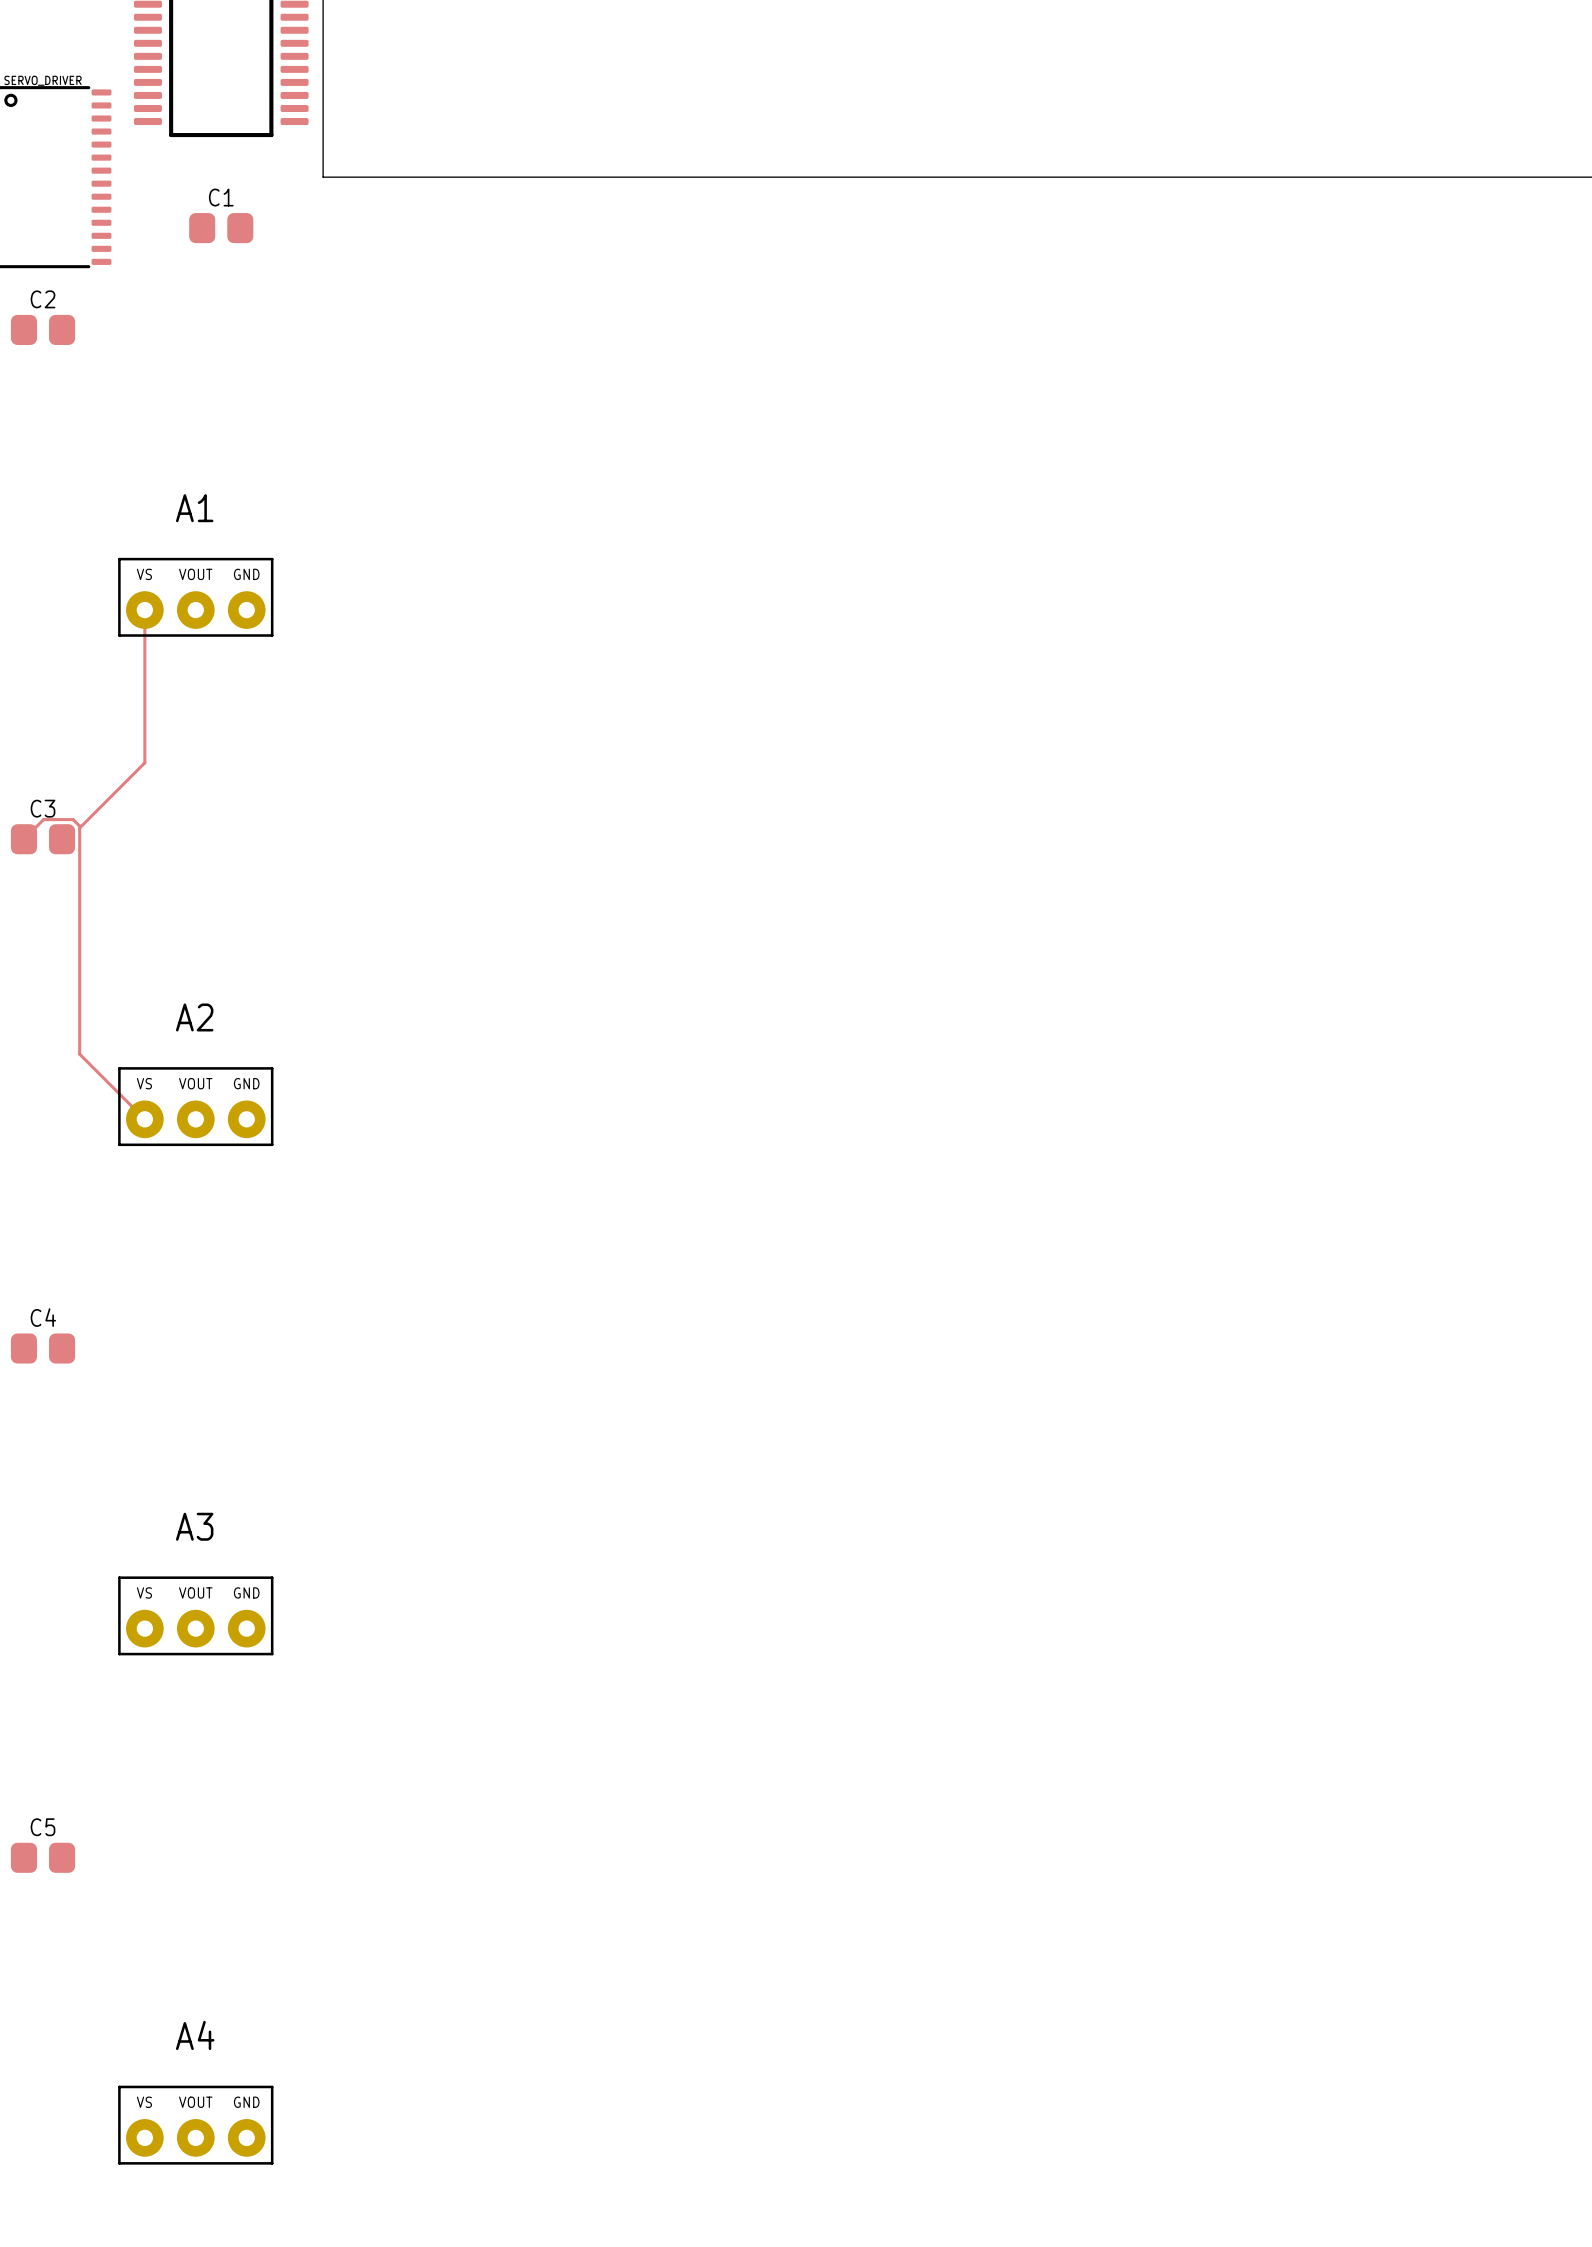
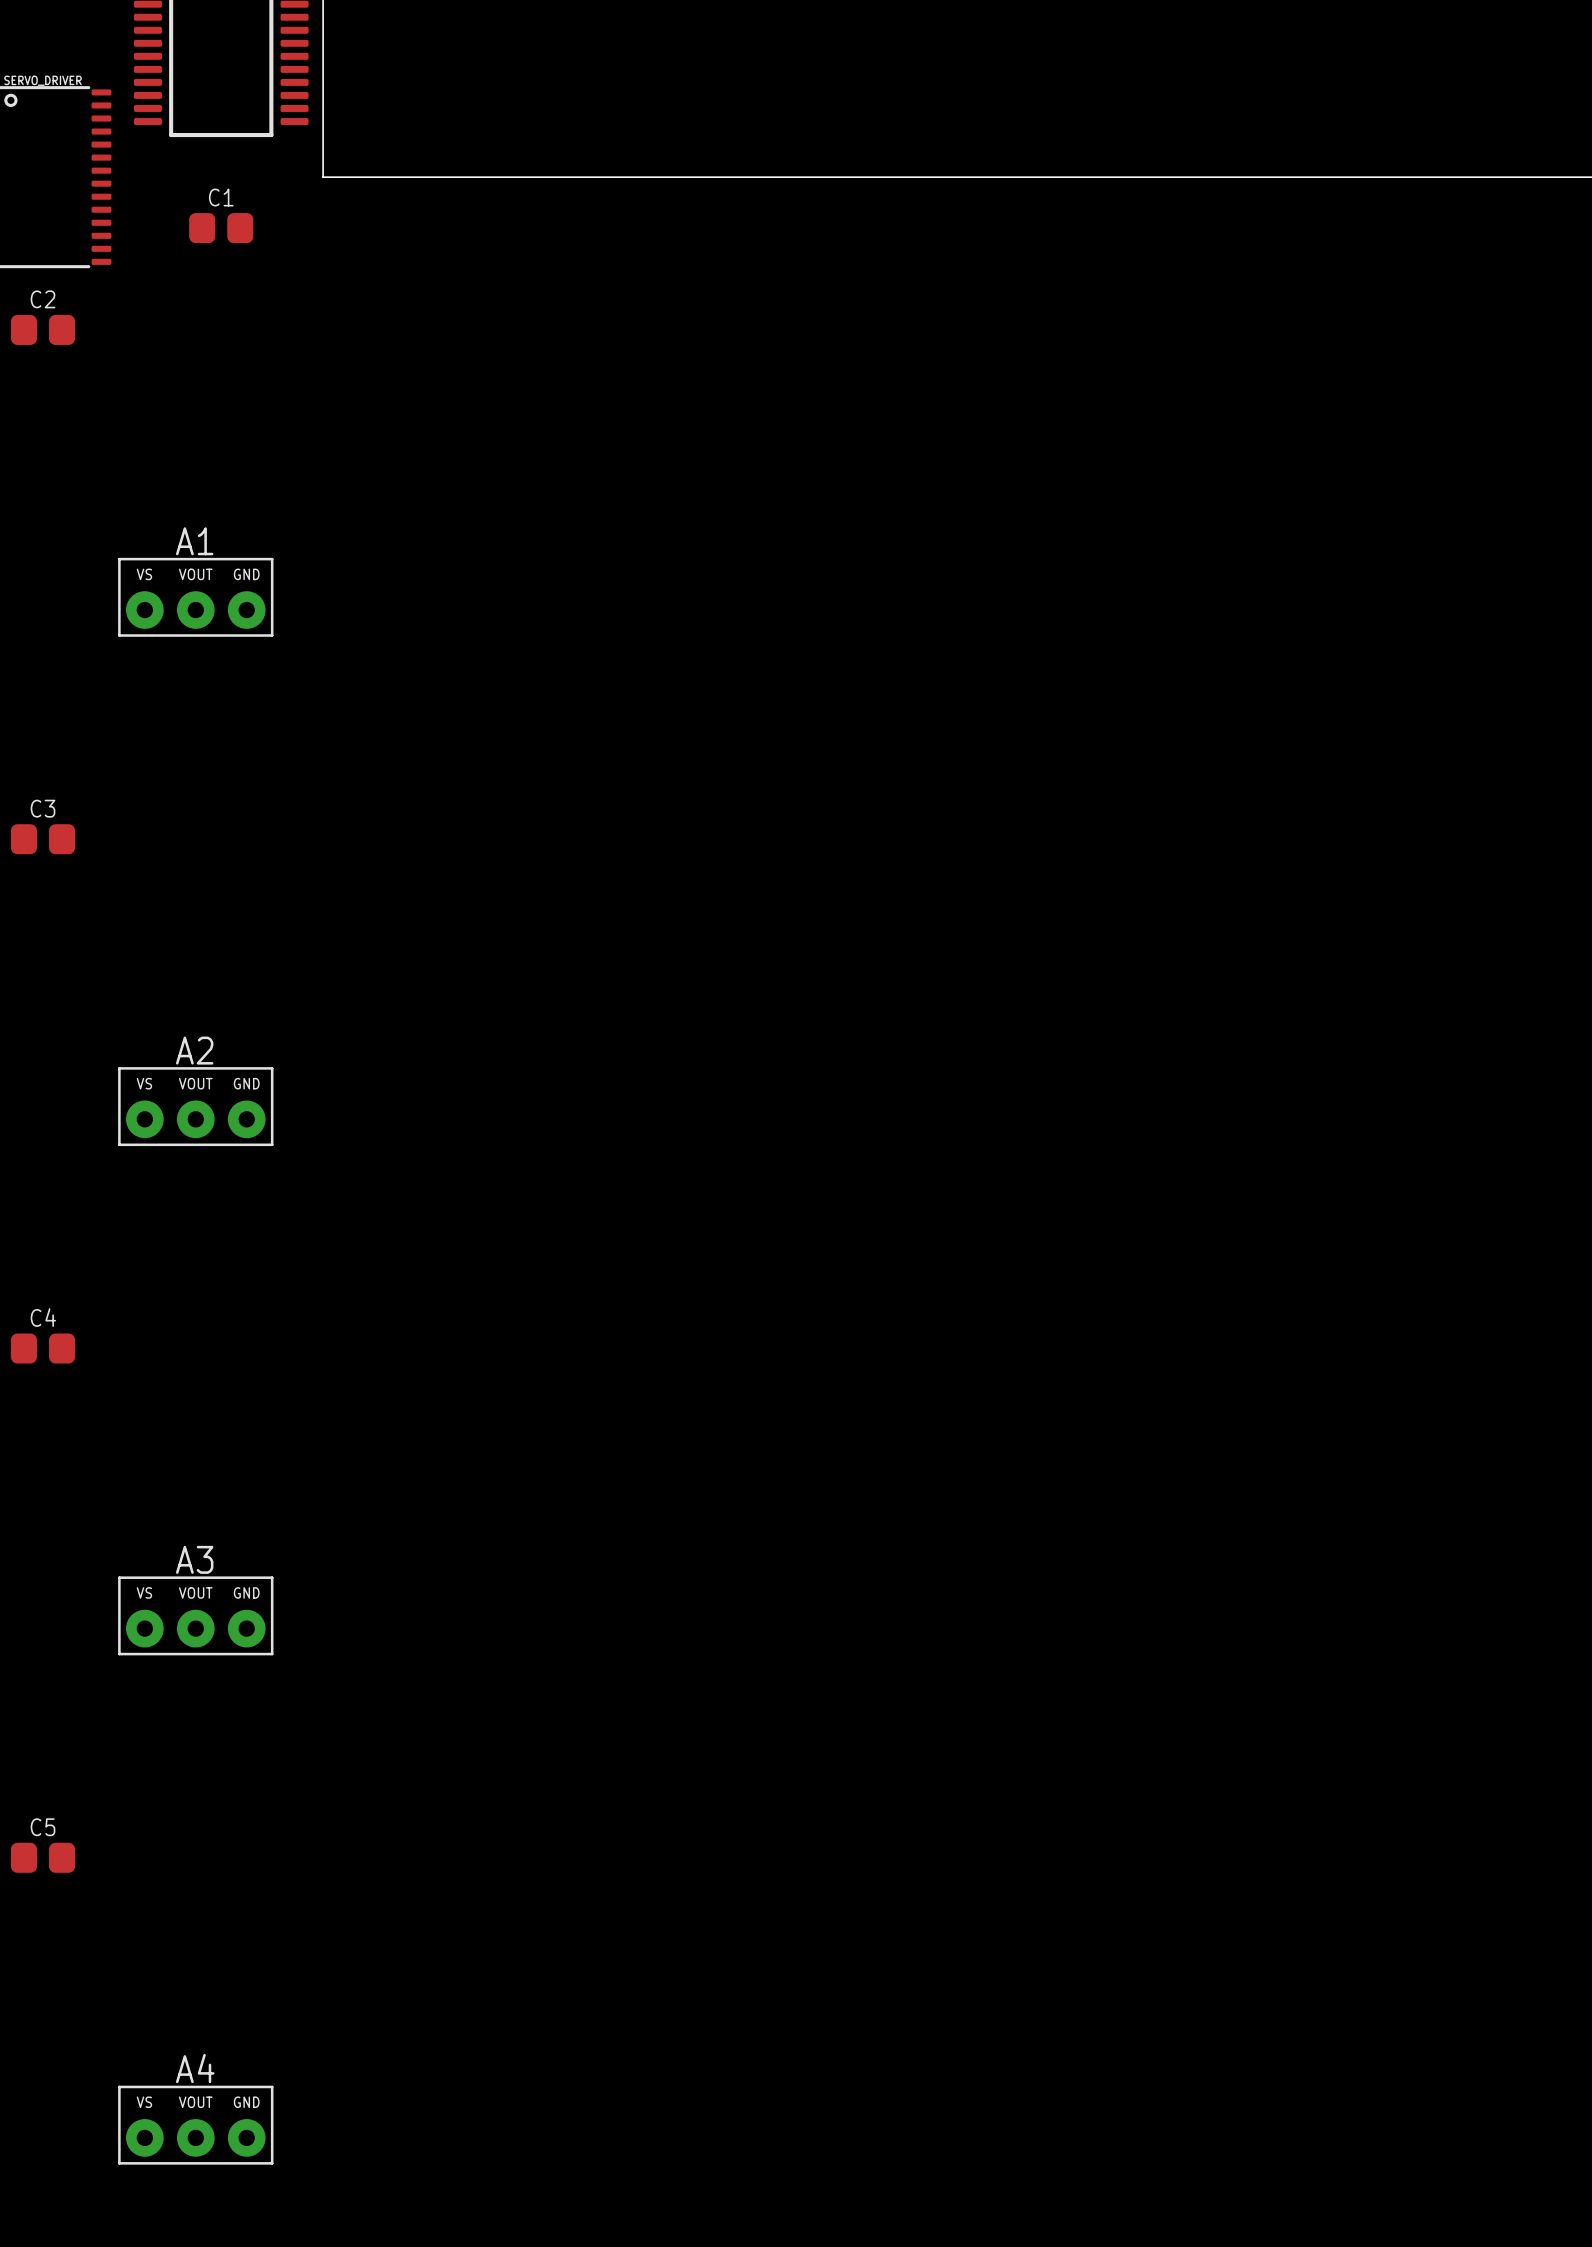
A1 name position: A1 (194, 508) -> A1 (194, 541)
top track: (144, 610) (144, 762) (79, 828) -> none
top track: (23, 839) (43, 819) (73, 819) (79, 826) (79, 1054) (144, 1119) -> none
A2 name position: A2 (194, 1017) -> A2 (194, 1050)
A3 name position: A3 (194, 1526) -> A3 (194, 1559)
A4 name position: A4 (195, 2035) -> A4 (195, 2068)

